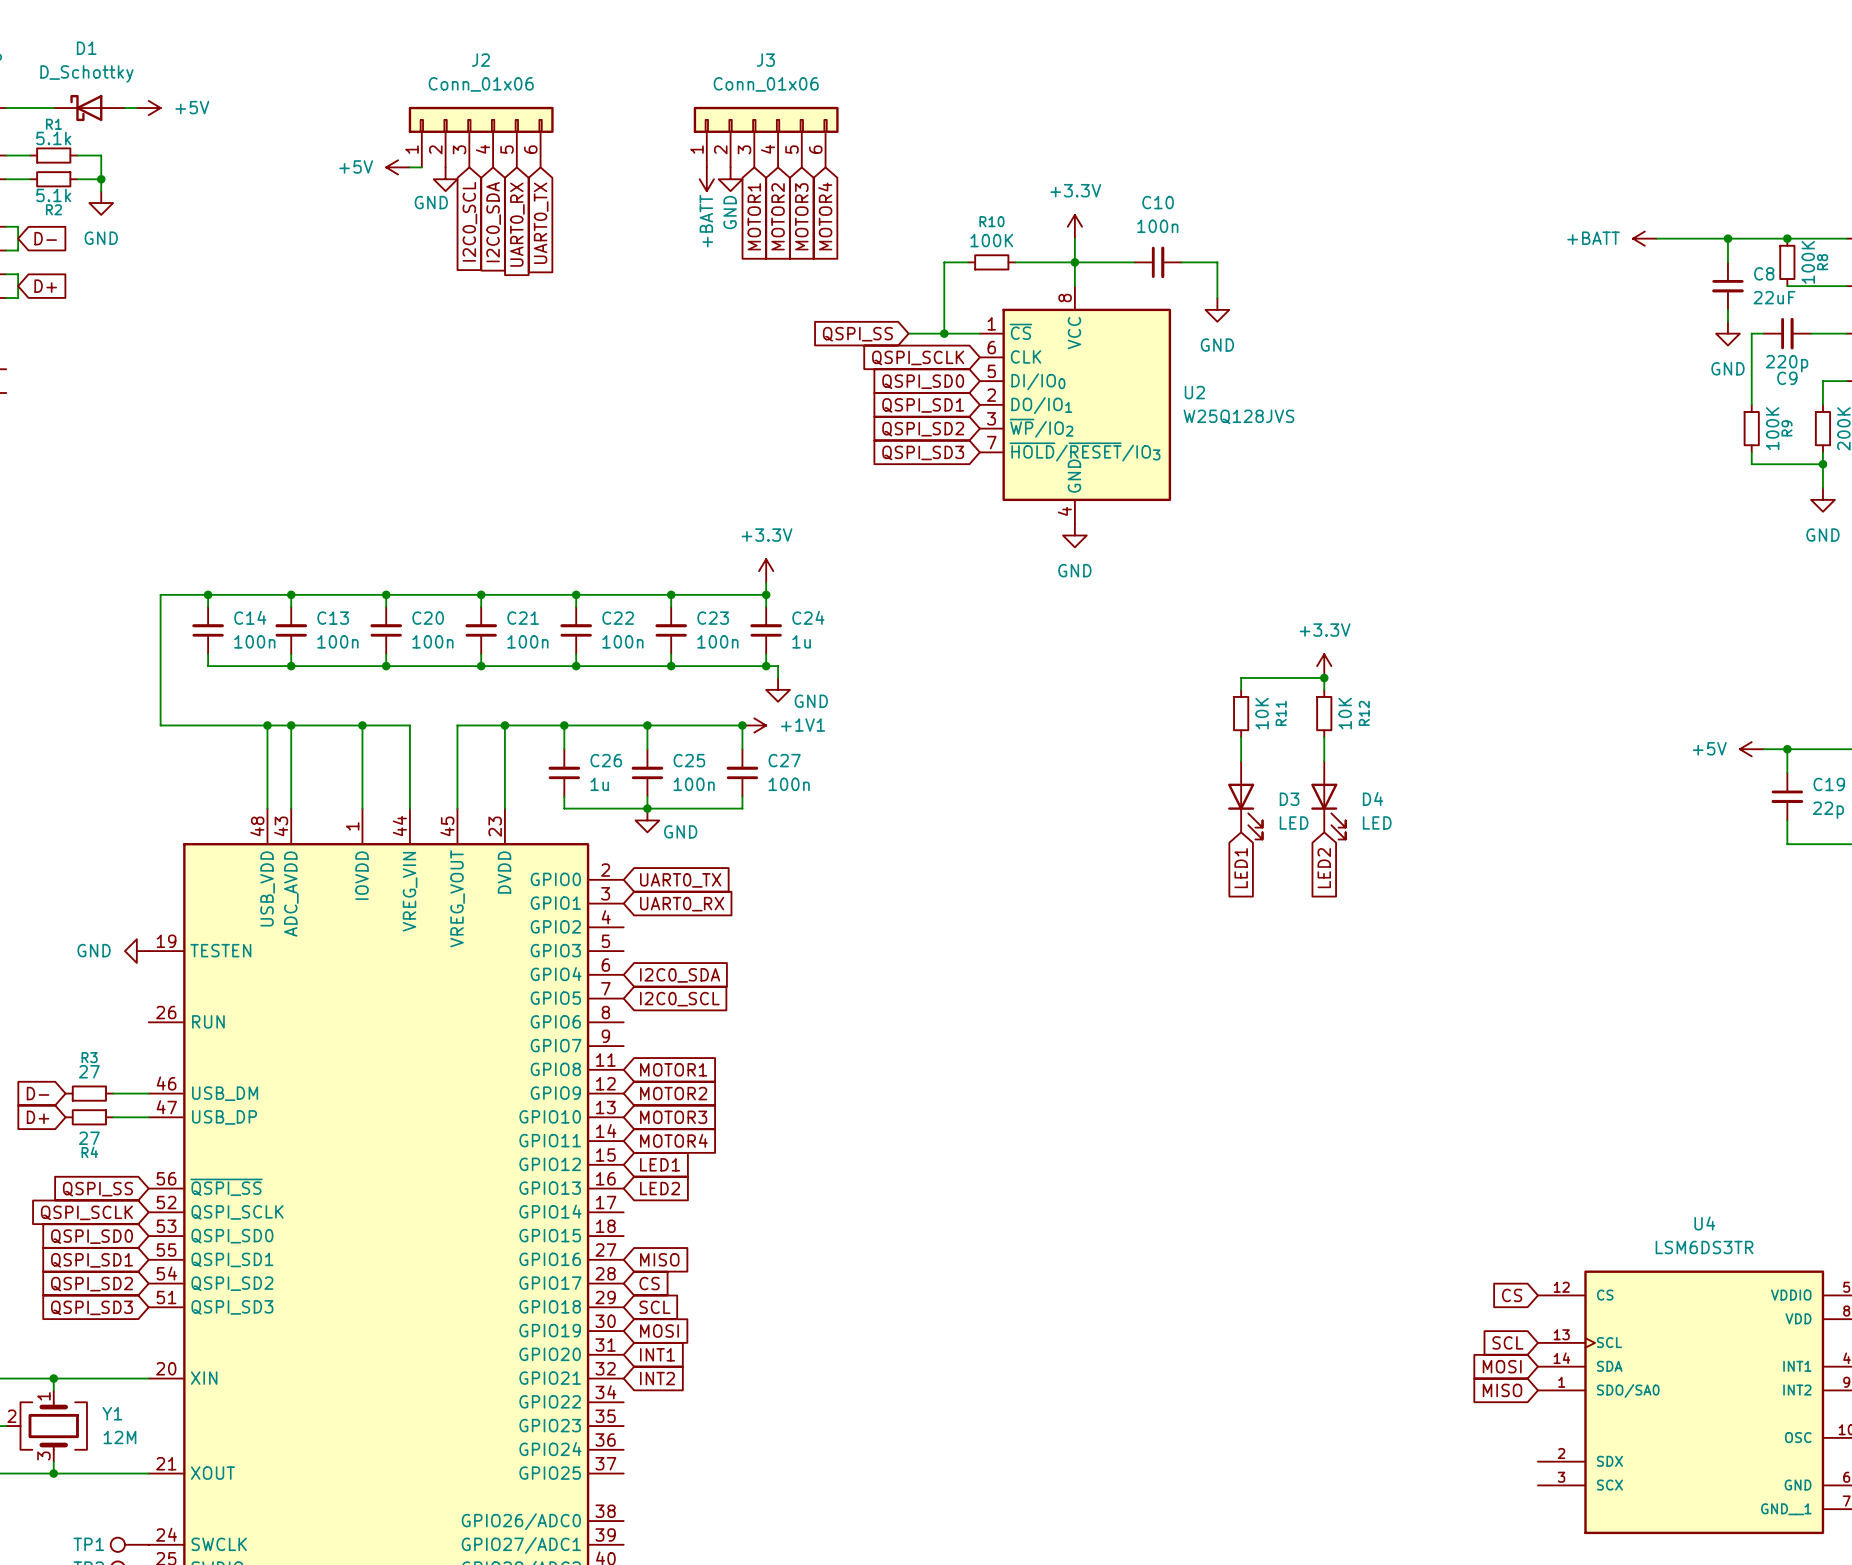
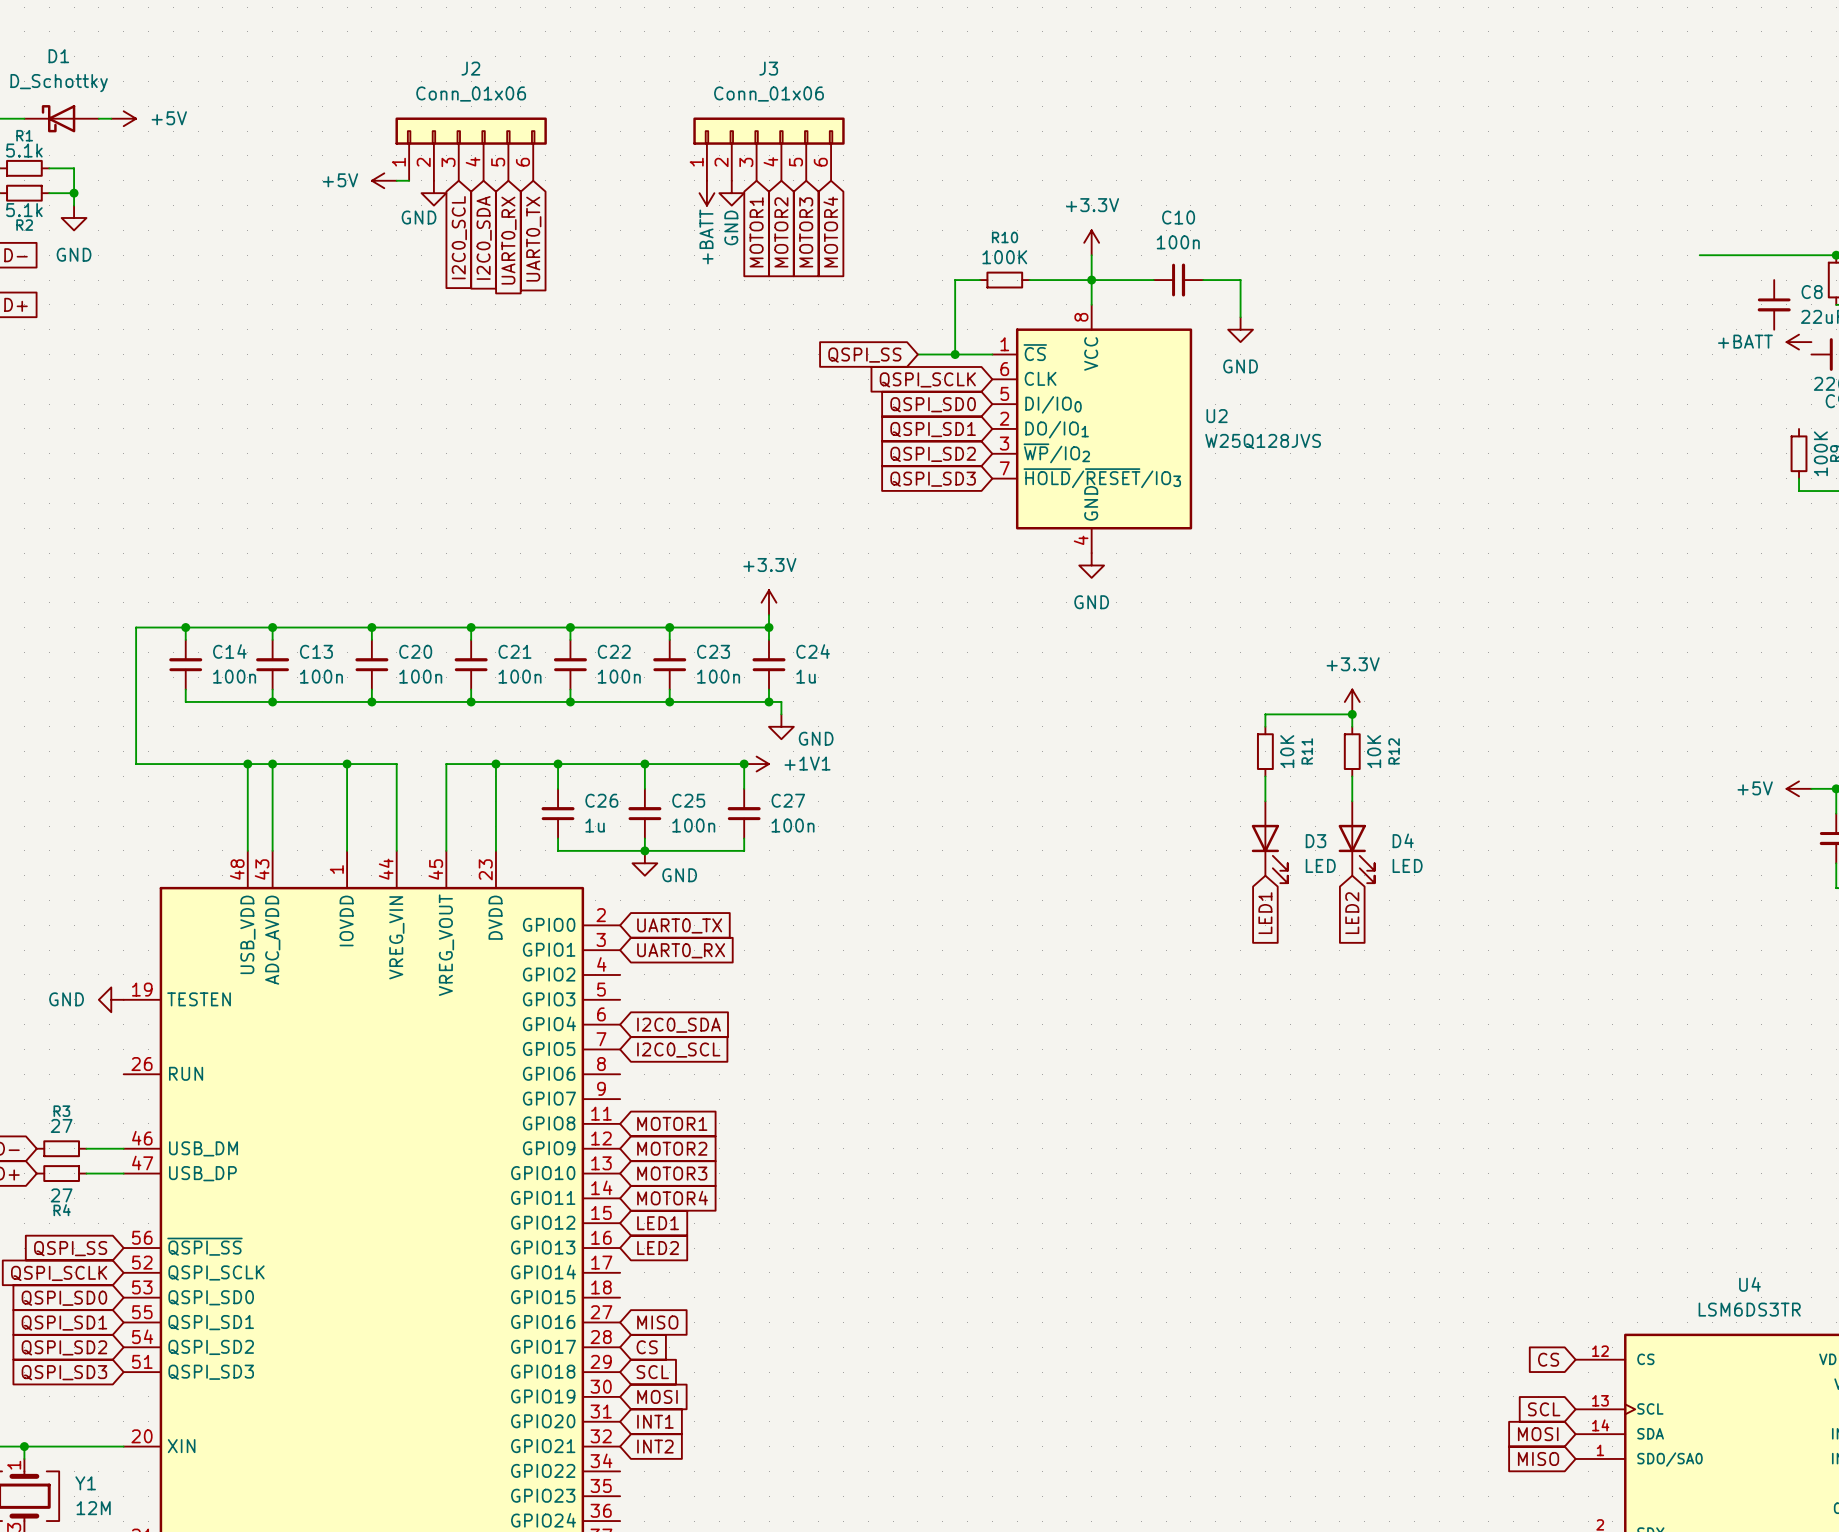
power symbol position: +BATT (1644, 238) -> +BATT (1799, 342)
wire: (1727, 238) (1727, 262) -> none
junction: (1727, 238) -> none
wire: (1727, 309) (1727, 321) -> none
power symbol: GND (1727, 333) -> none
wire: (1763, 333) (1751, 333) (1751, 404) -> none

